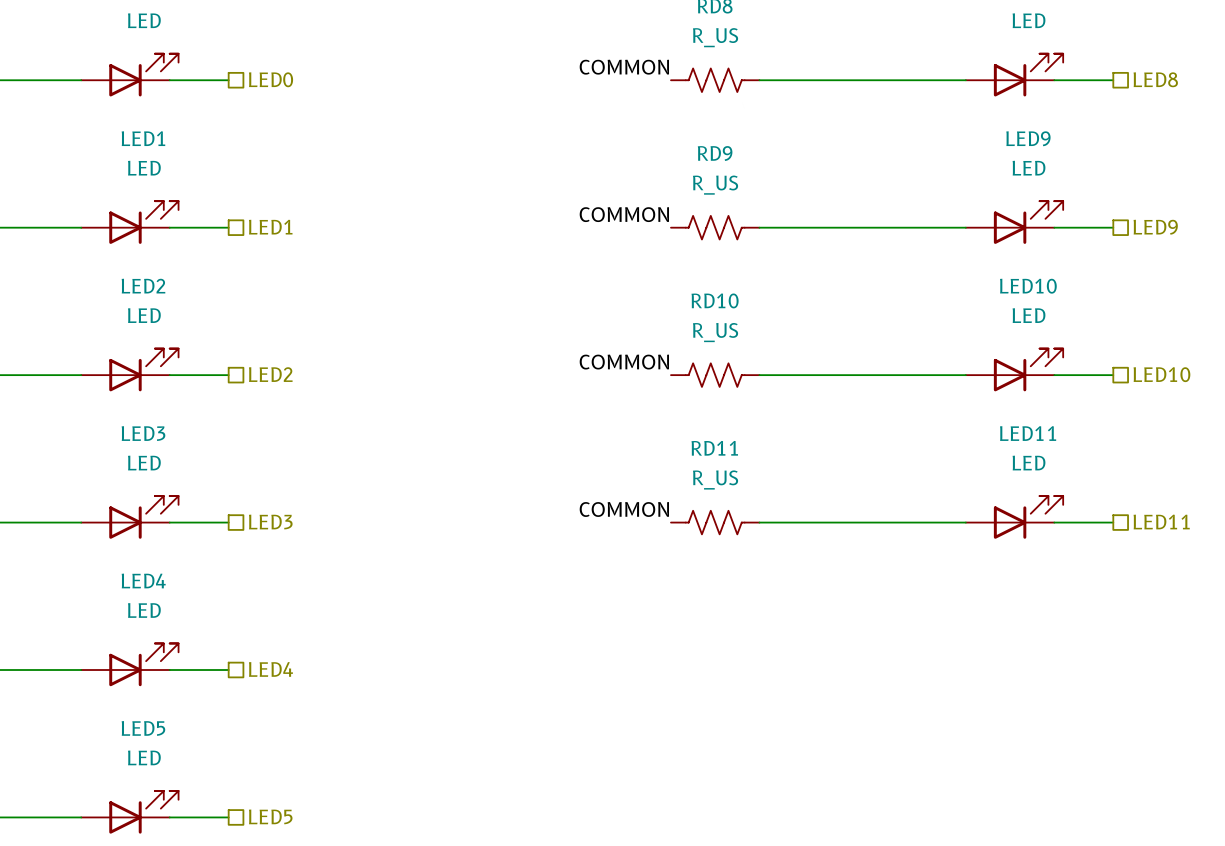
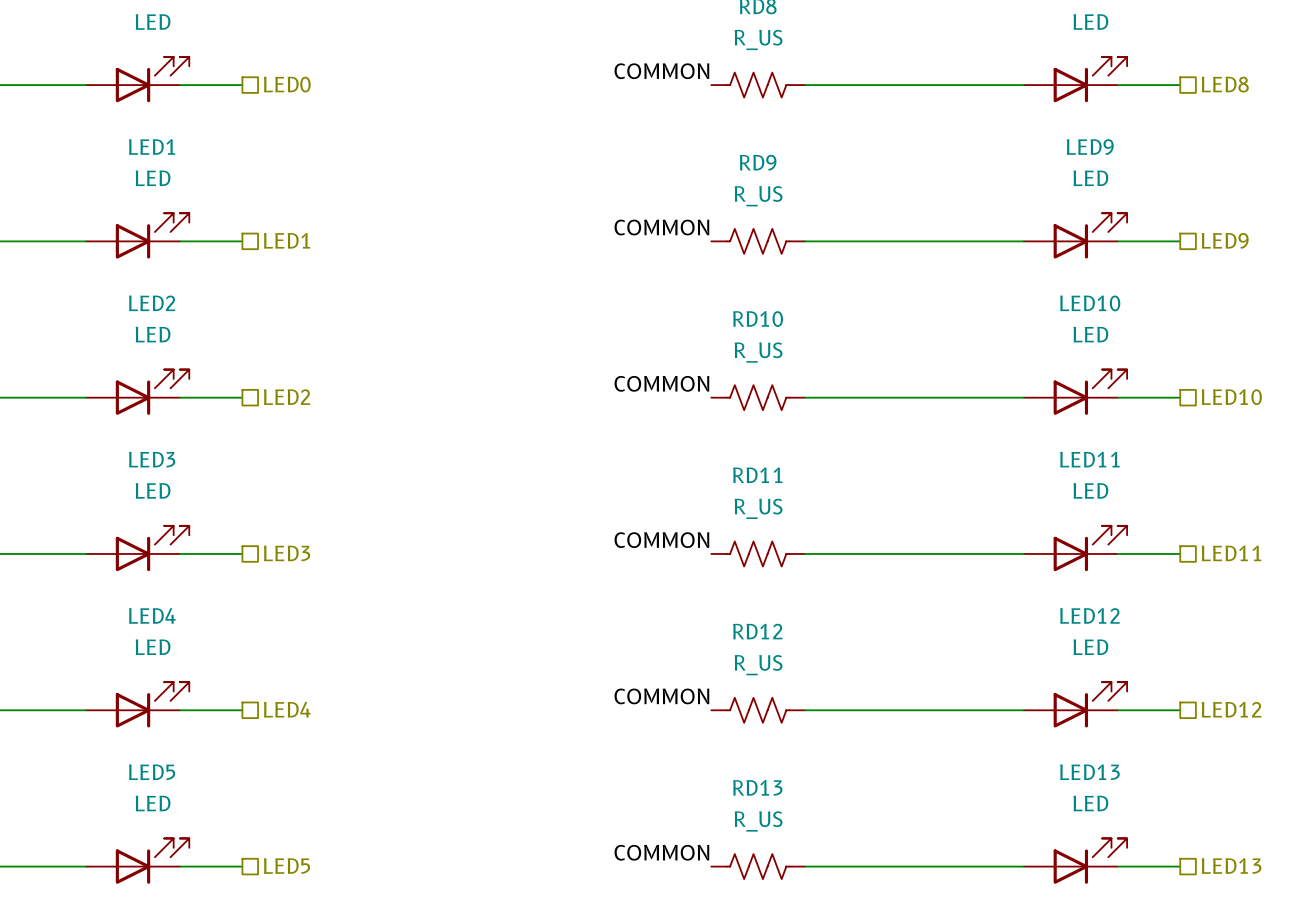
label: none -> COMMON (661, 696)
LED12: none -> LED (1075, 704)
hierarchical label: none -> LED12 (1231, 709)
RD12: none -> R_US (758, 710)
wire: none -> (805, 710) (1023, 710)
wire: none -> (1117, 710) (1180, 710)
label: none -> COMMON (661, 852)
LED13: none -> LED (1075, 861)
hierarchical label: none -> LED13 (1231, 866)
RD13: none -> R_US (758, 866)
wire: none -> (805, 866) (1023, 866)
wire: none -> (1117, 866) (1180, 866)

